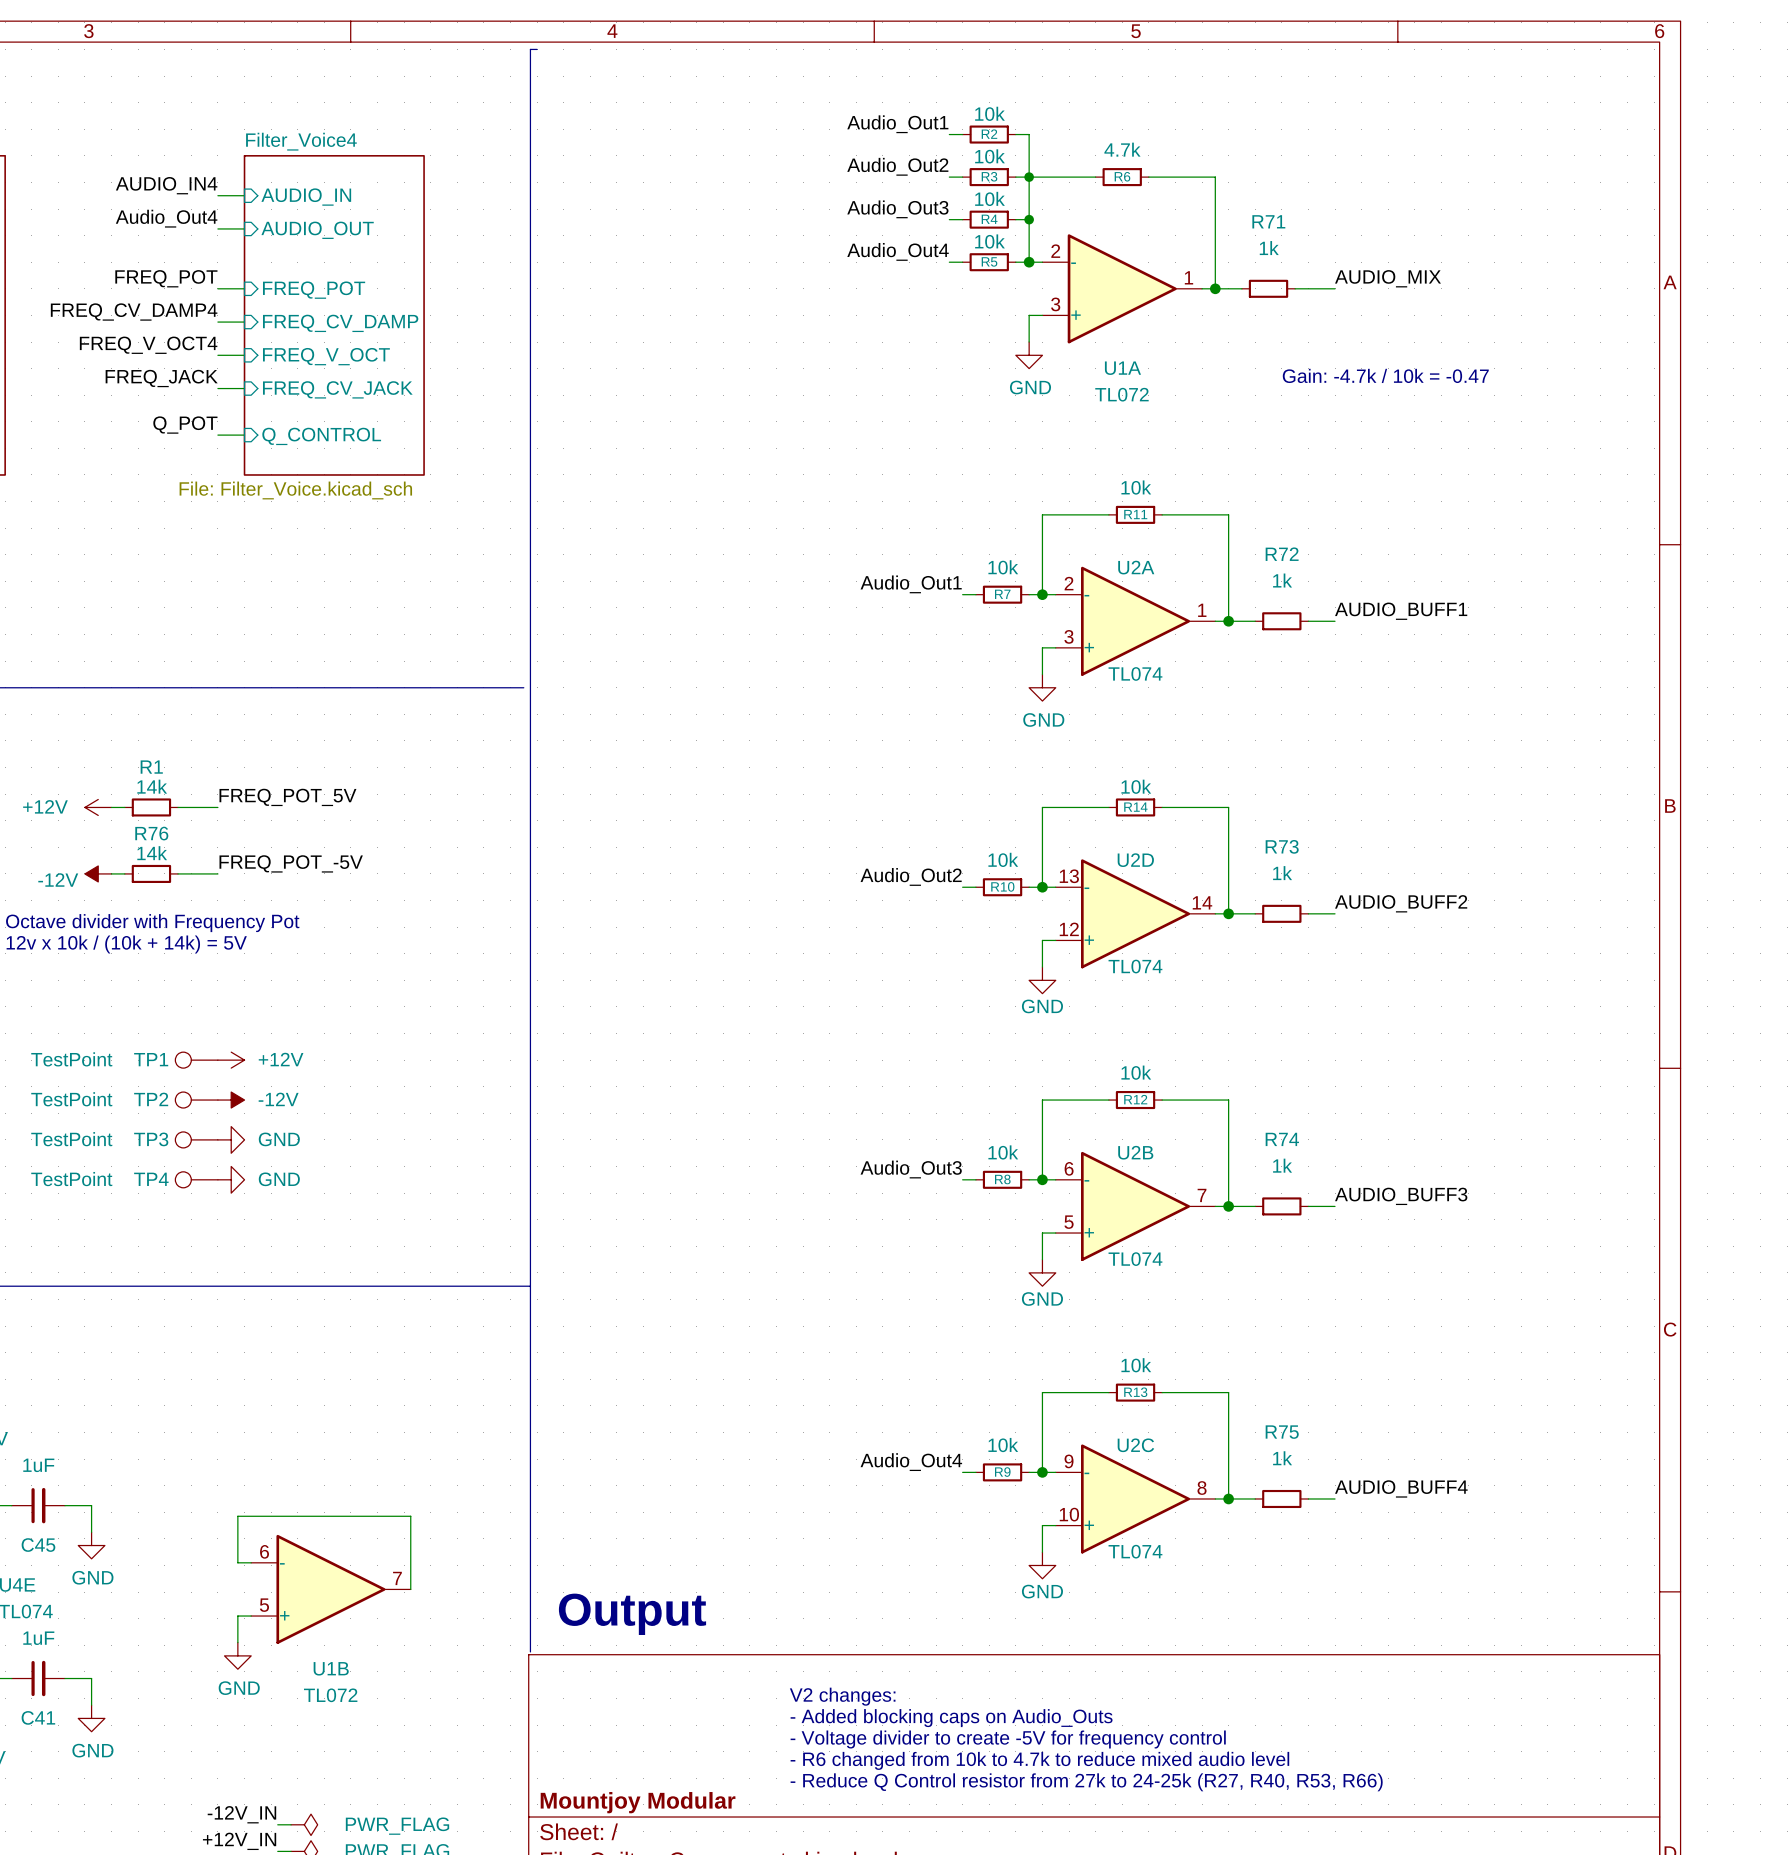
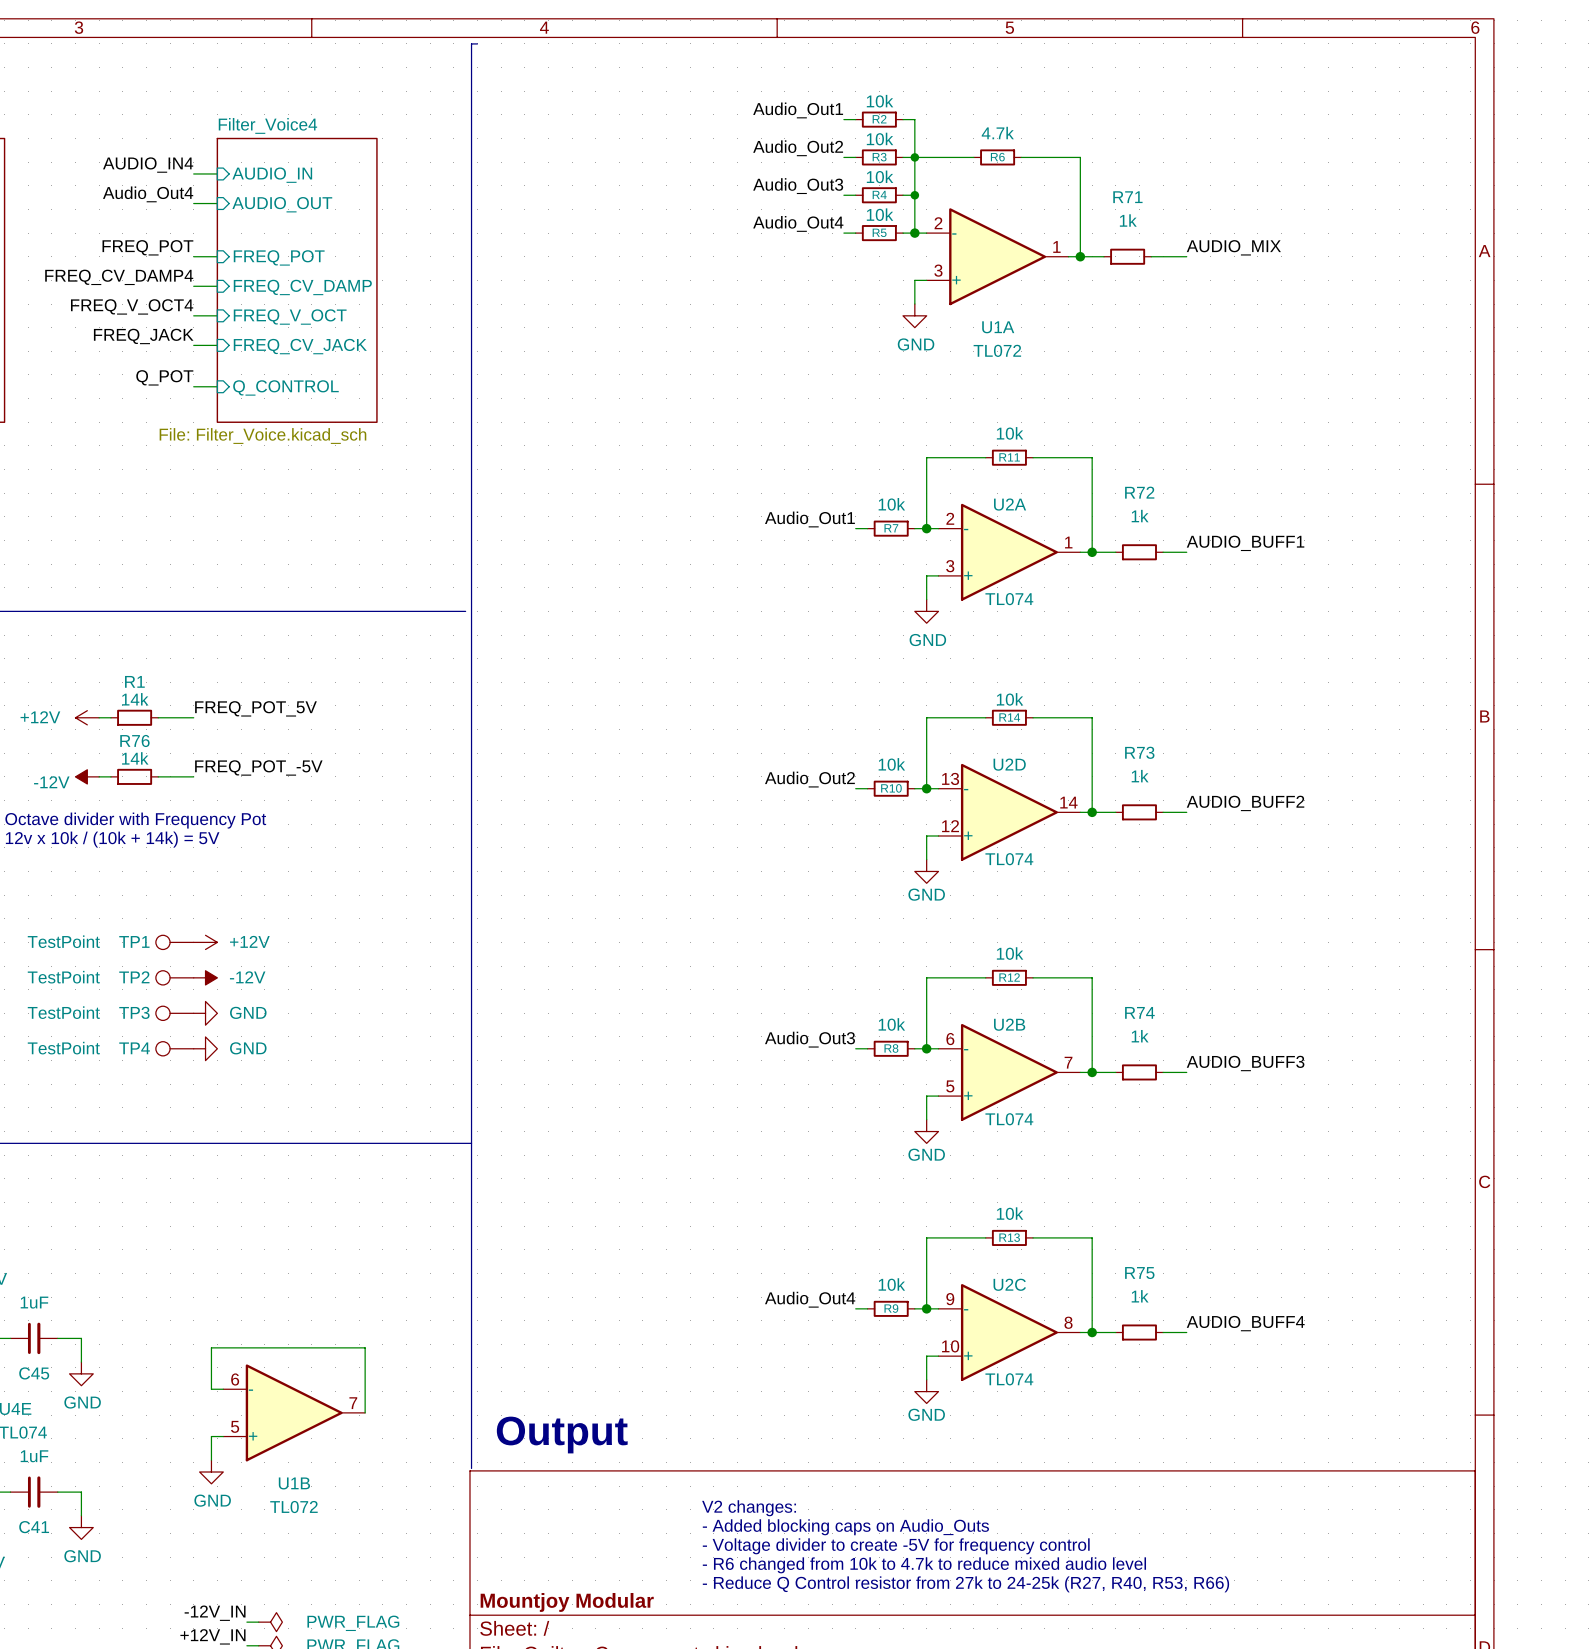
text: Gain: -4.7k / 10k = -0.47 (1385, 375) -> none

